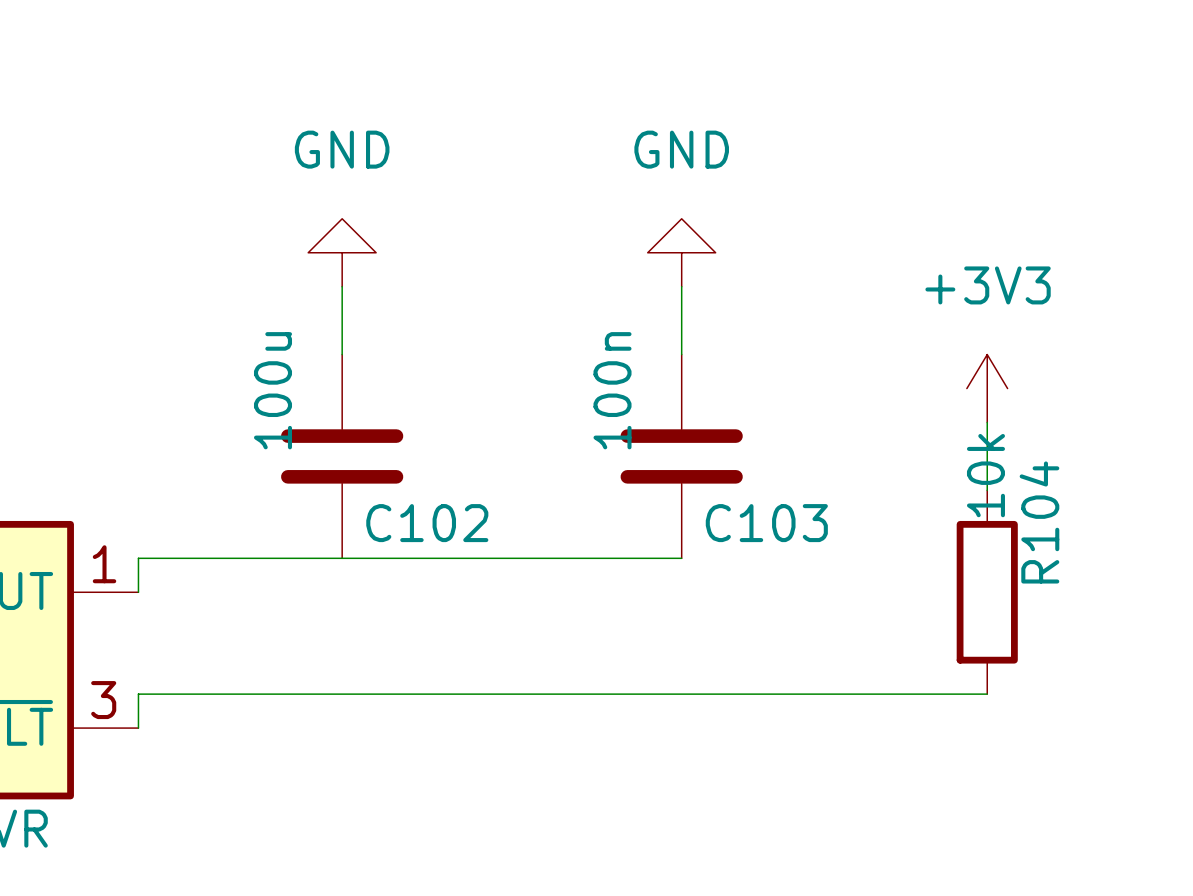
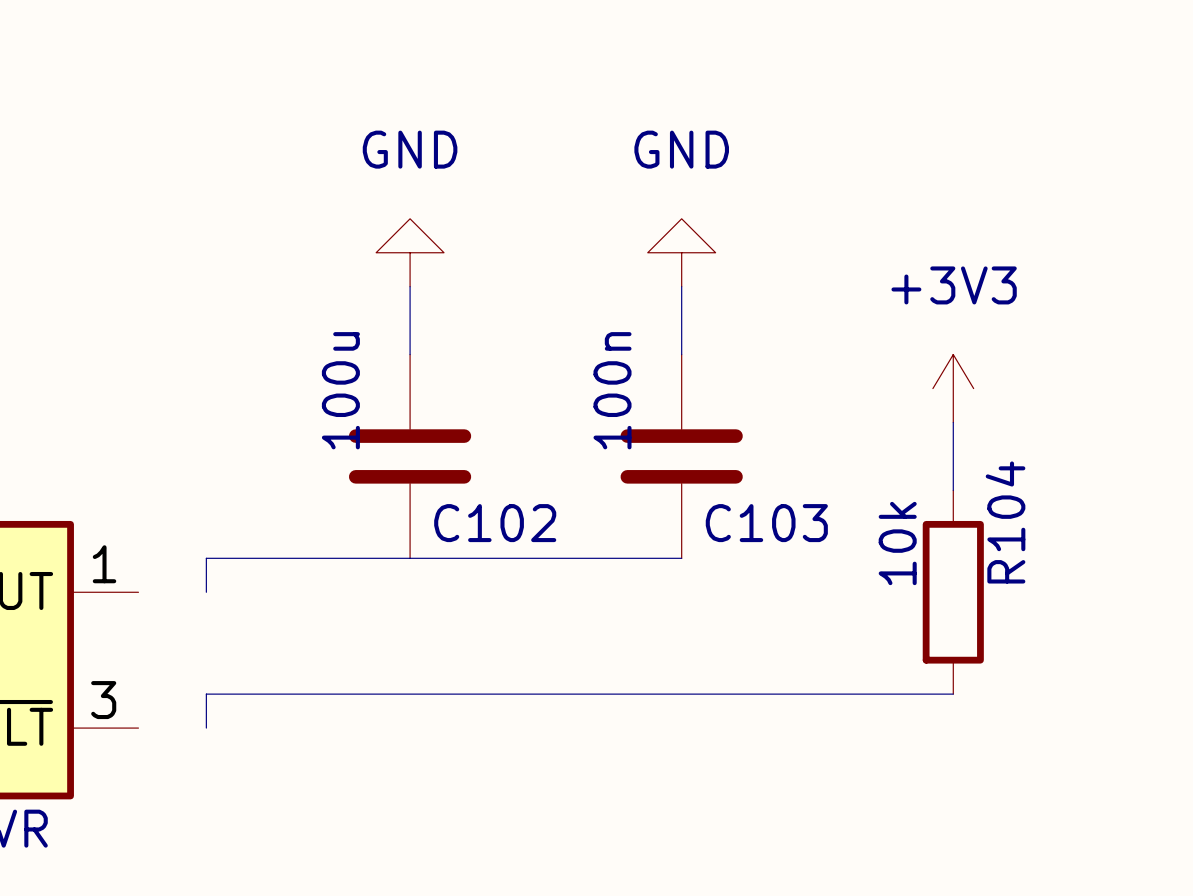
power symbol position: GND (342, 252) -> GND (410, 252)
wire: (342, 286) (342, 354) -> (410, 286) (410, 354)
power symbol position: +3V3 (987, 388) -> +3V3 (953, 388)
wire: (987, 422) (987, 490) -> (953, 422) (953, 490)
C102 position: (342, 456) -> (410, 456)
R104 value position: 10k (985, 475) -> 10k (897, 543)
wire: (206, 558) (138, 558) (138, 592) -> (206, 558) (206, 592)
R104 position: (987, 592) -> (953, 592)
wire: (206, 694) (138, 694) (138, 728) -> (206, 694) (206, 728)
wire: (953, 694) (987, 694) -> none

